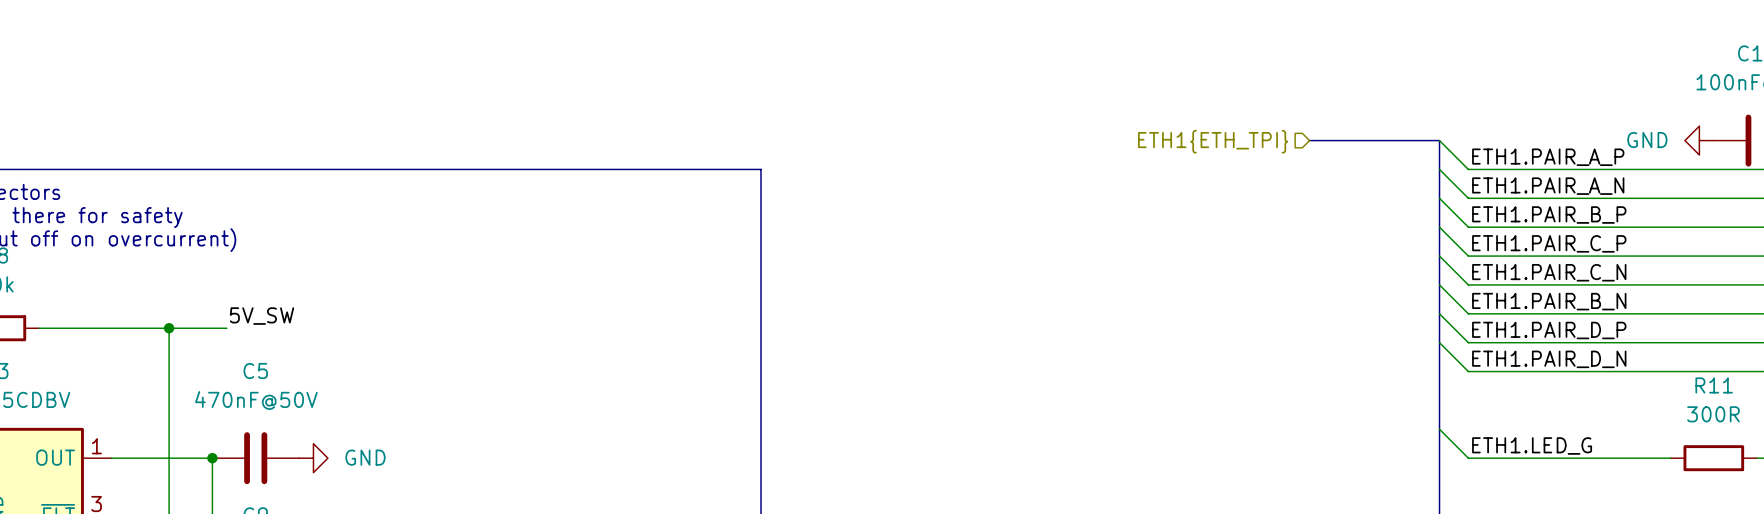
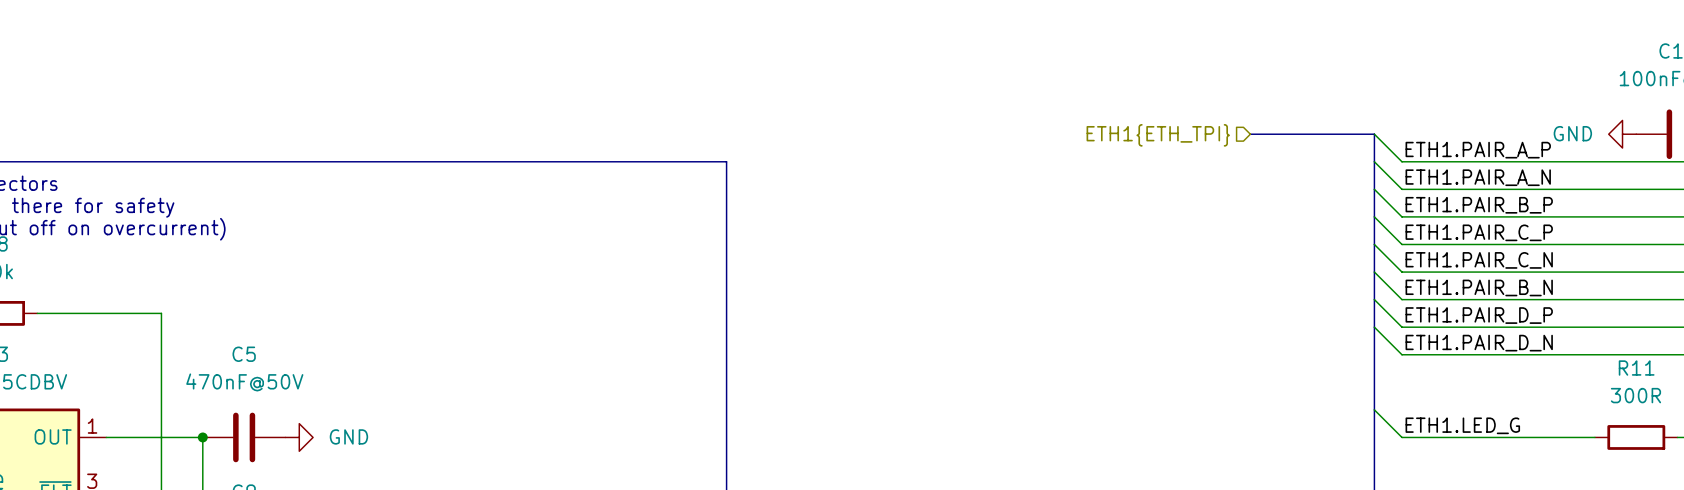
label: 5V_SW (262, 316) -> none
wire: (169, 328) (226, 328) -> none
junction: (169, 328) -> none

